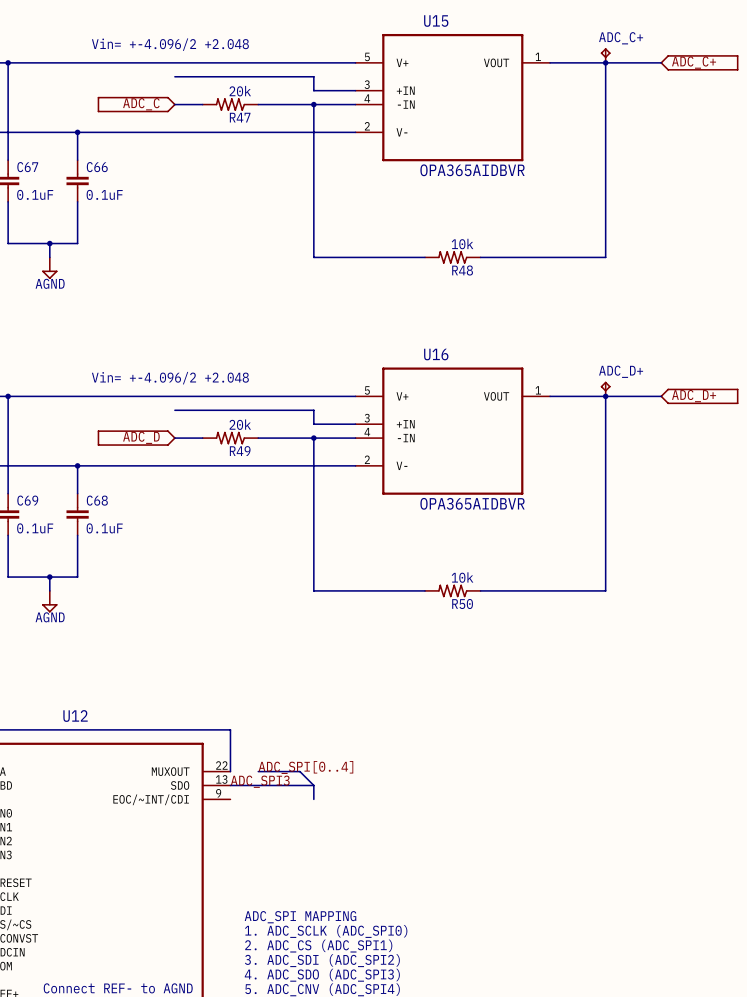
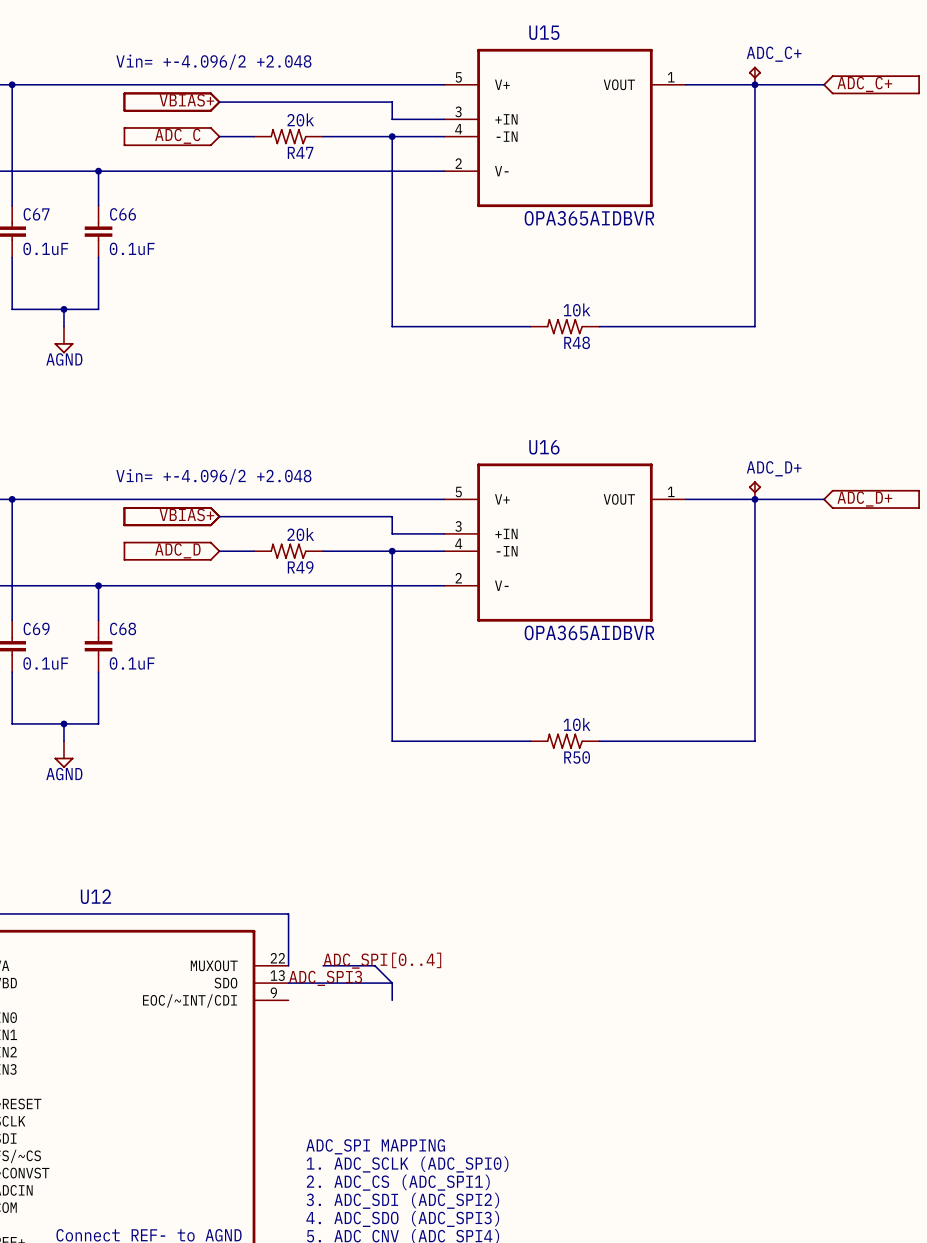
label: none -> VBIAS+ (186, 100)
part: none -> (171, 102)
label: none -> VBIAS+ (186, 514)
part: none -> (171, 516)

